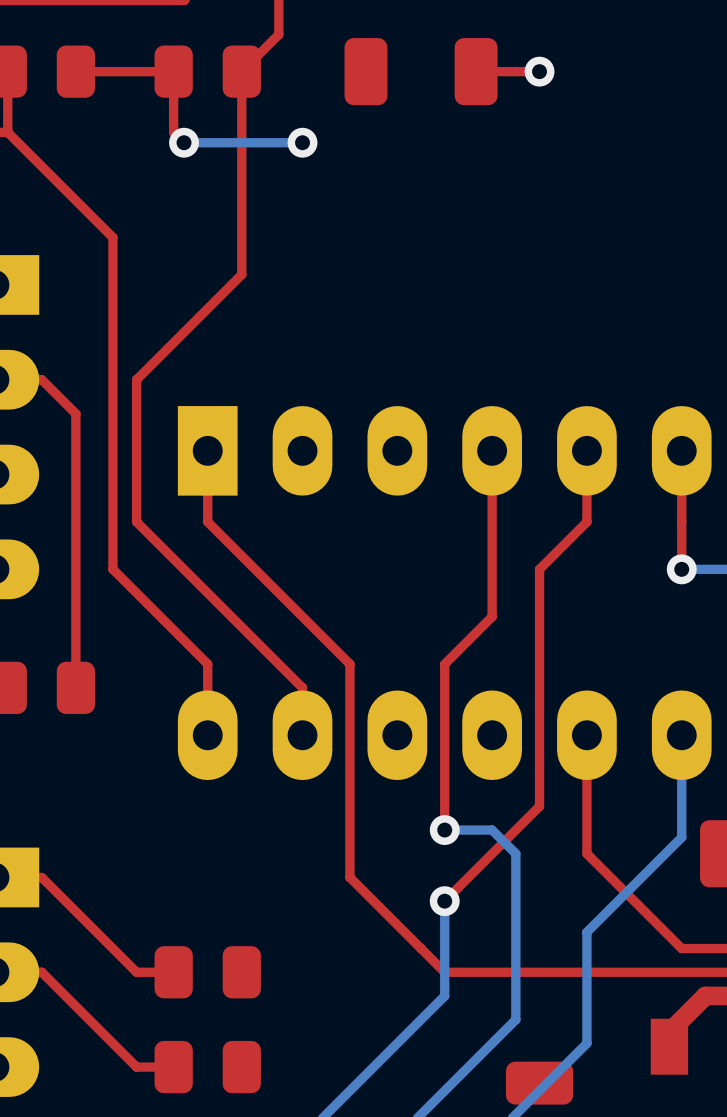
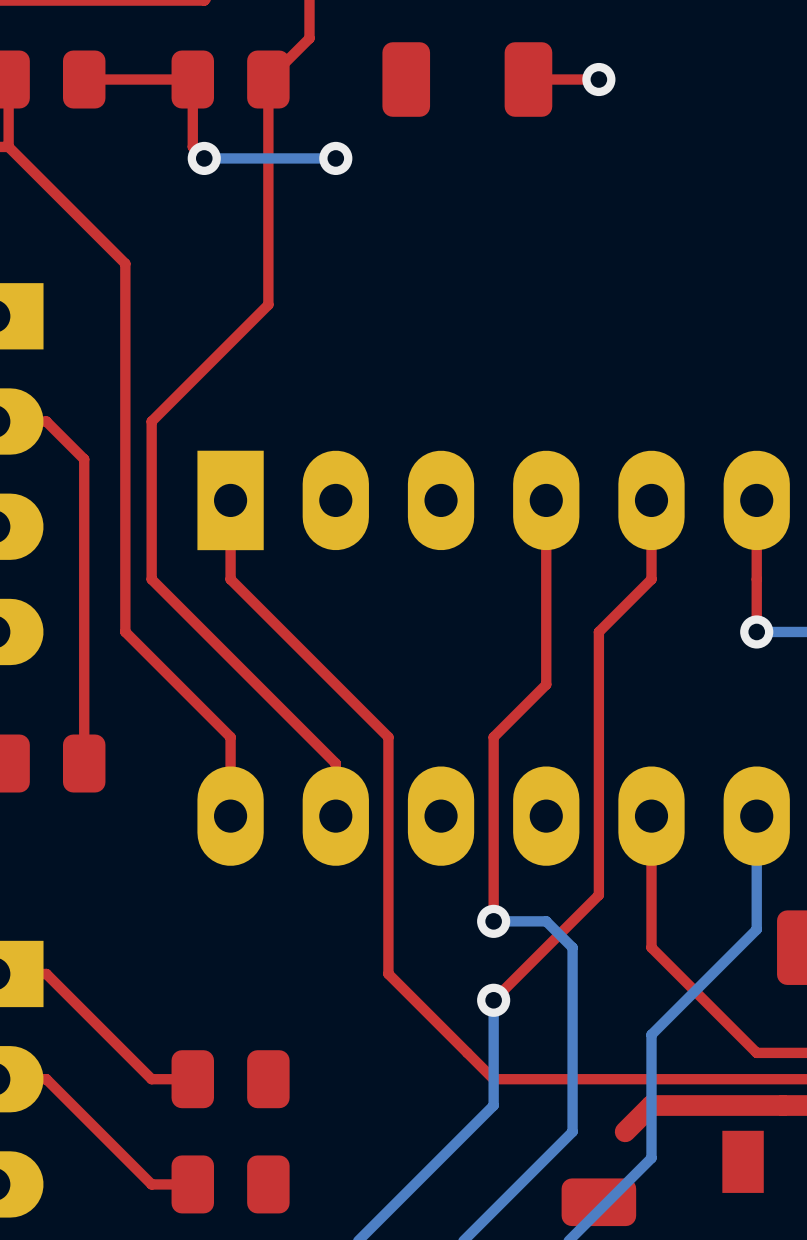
top track: (705, 995) (669, 1031) -> (783, 1105) (651, 1105) (625, 1131)

